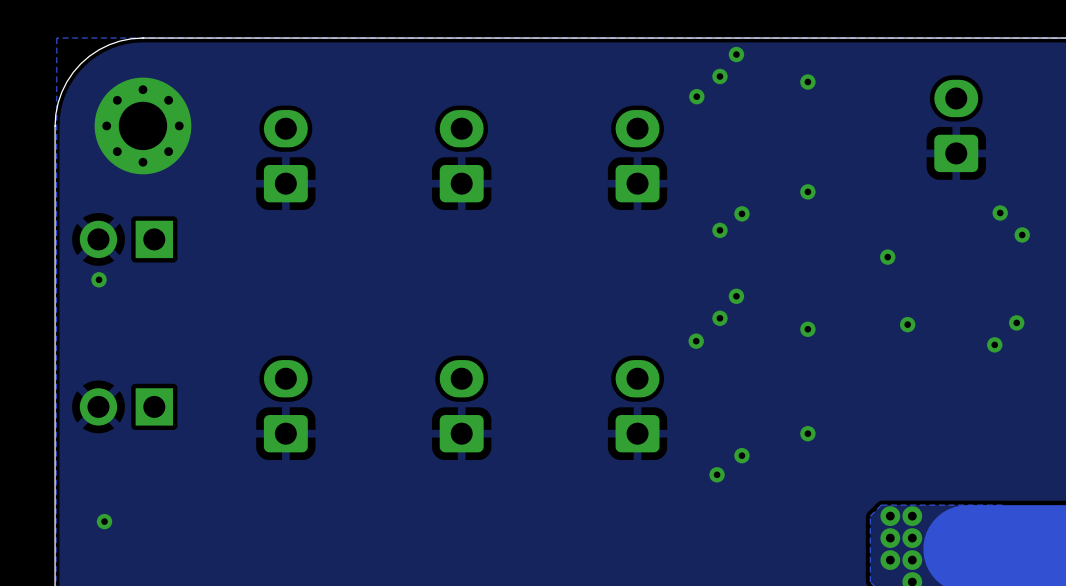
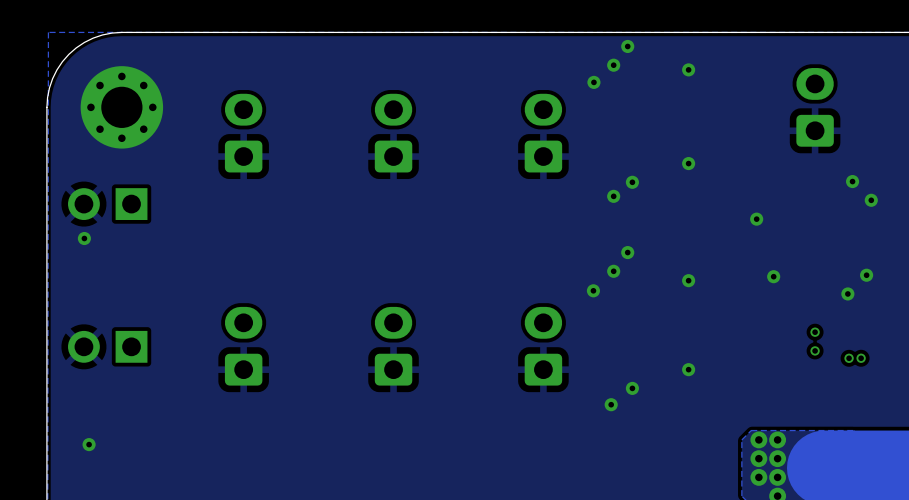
via: none -> (815, 332)
via: none -> (815, 350)
via: none -> (849, 358)
via: none -> (861, 358)

